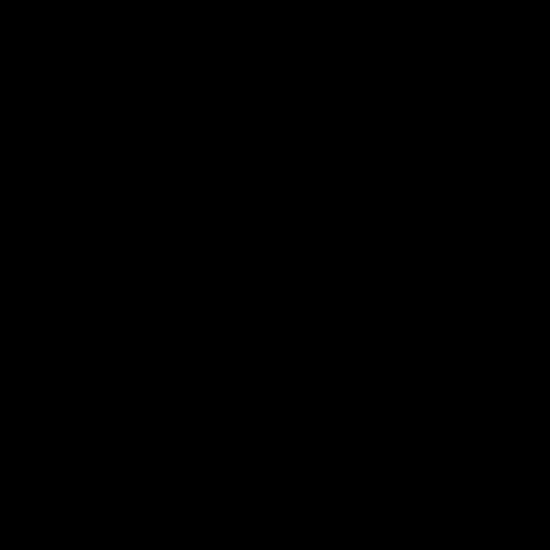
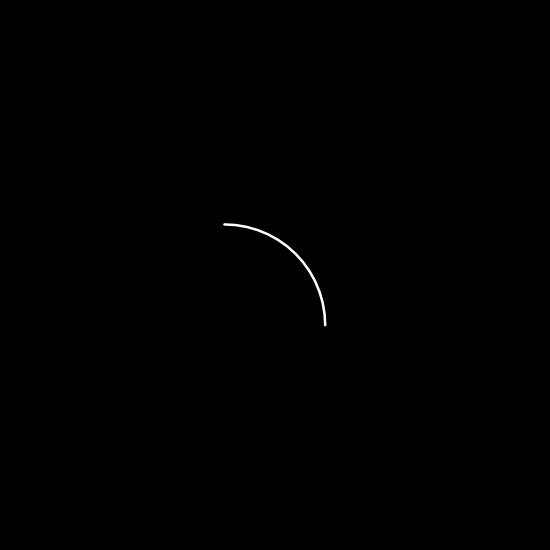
board edge: none -> (224, 224) (246, 226) (268, 234) (295, 253) (309, 271) (319, 291) (325, 325)

